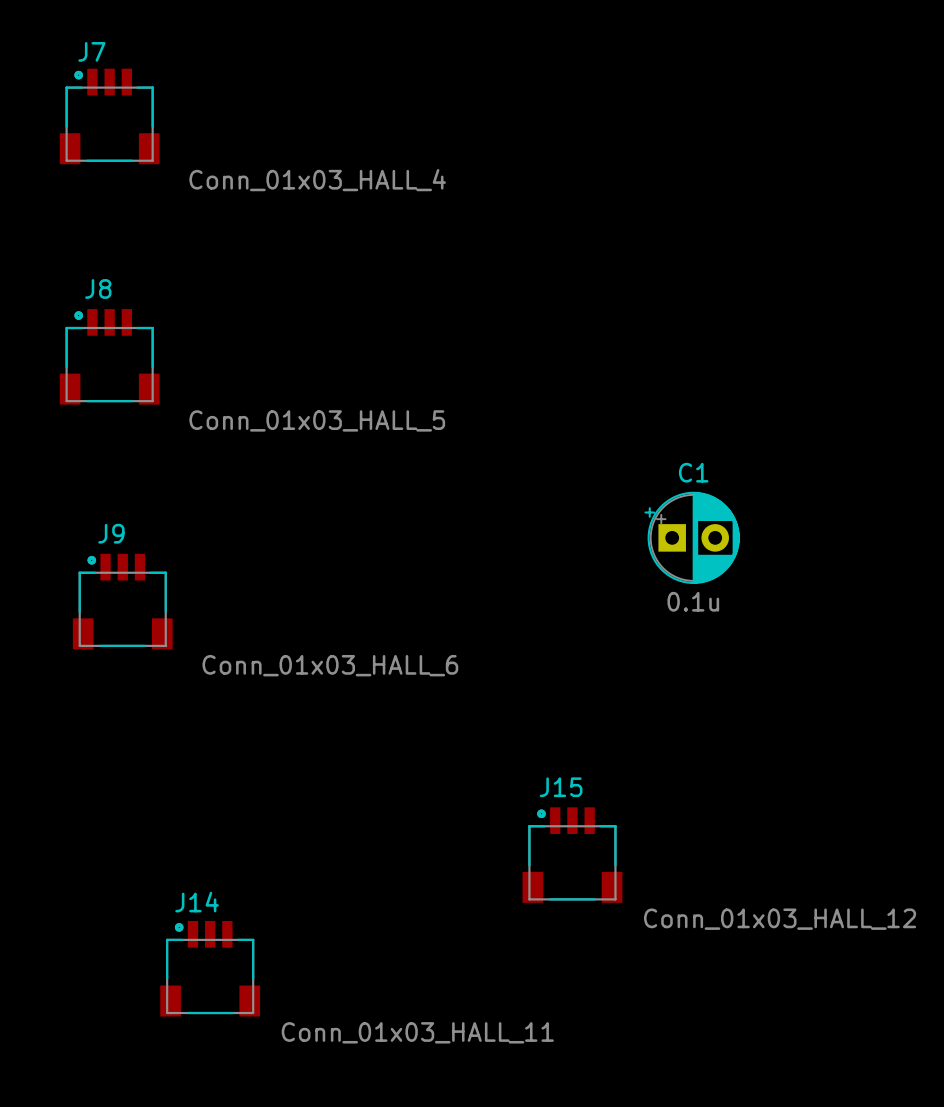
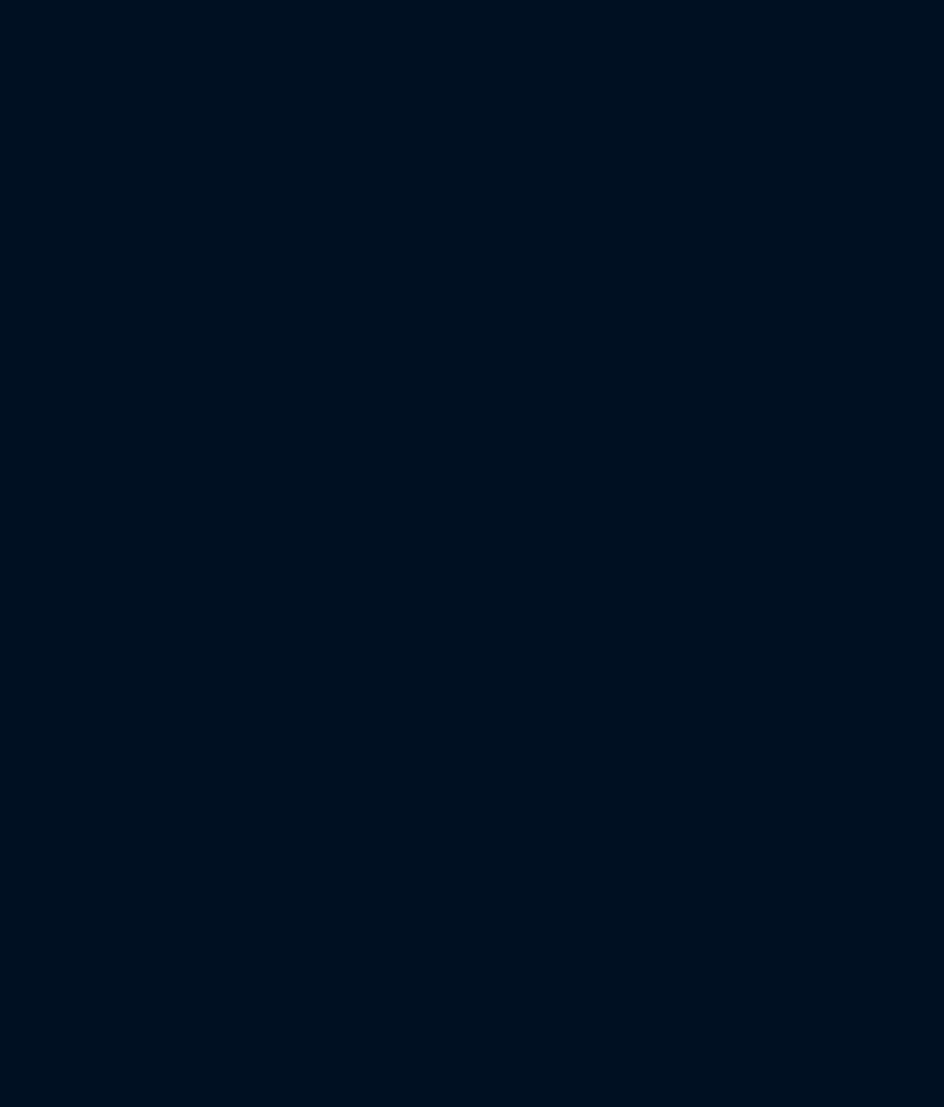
J7: Conn_01x03_HALL_4 (109, 116) -> none
J8: Conn_01x03_HALL_5 (109, 356) -> none
C1: 0.1u (692, 537) -> none
J9: Conn_01x03_HALL_6 (122, 601) -> none
J15: Conn_01x03_HALL_12 (572, 855) -> none
J14: Conn_01x03_HALL_11 (210, 968) -> none

